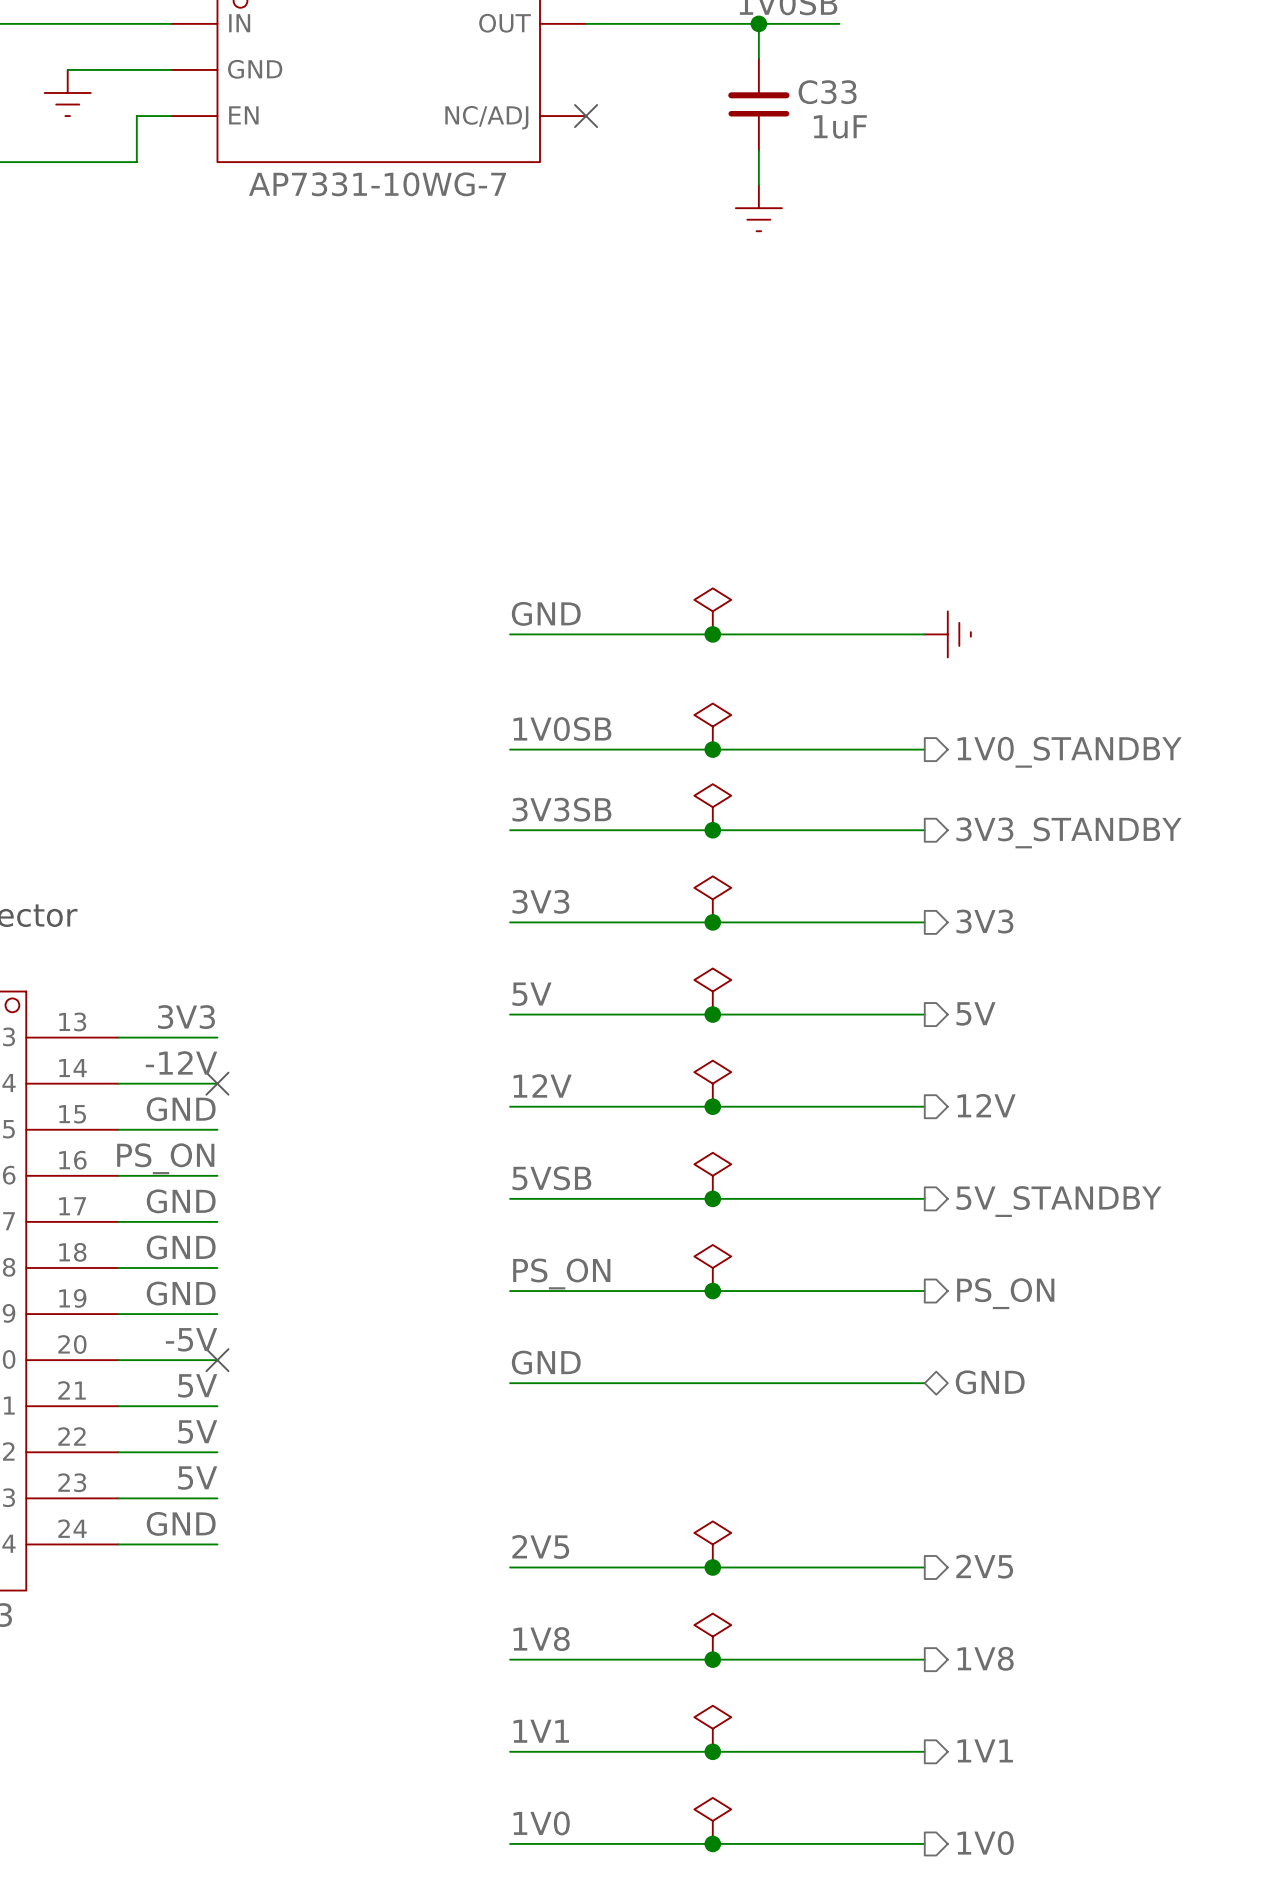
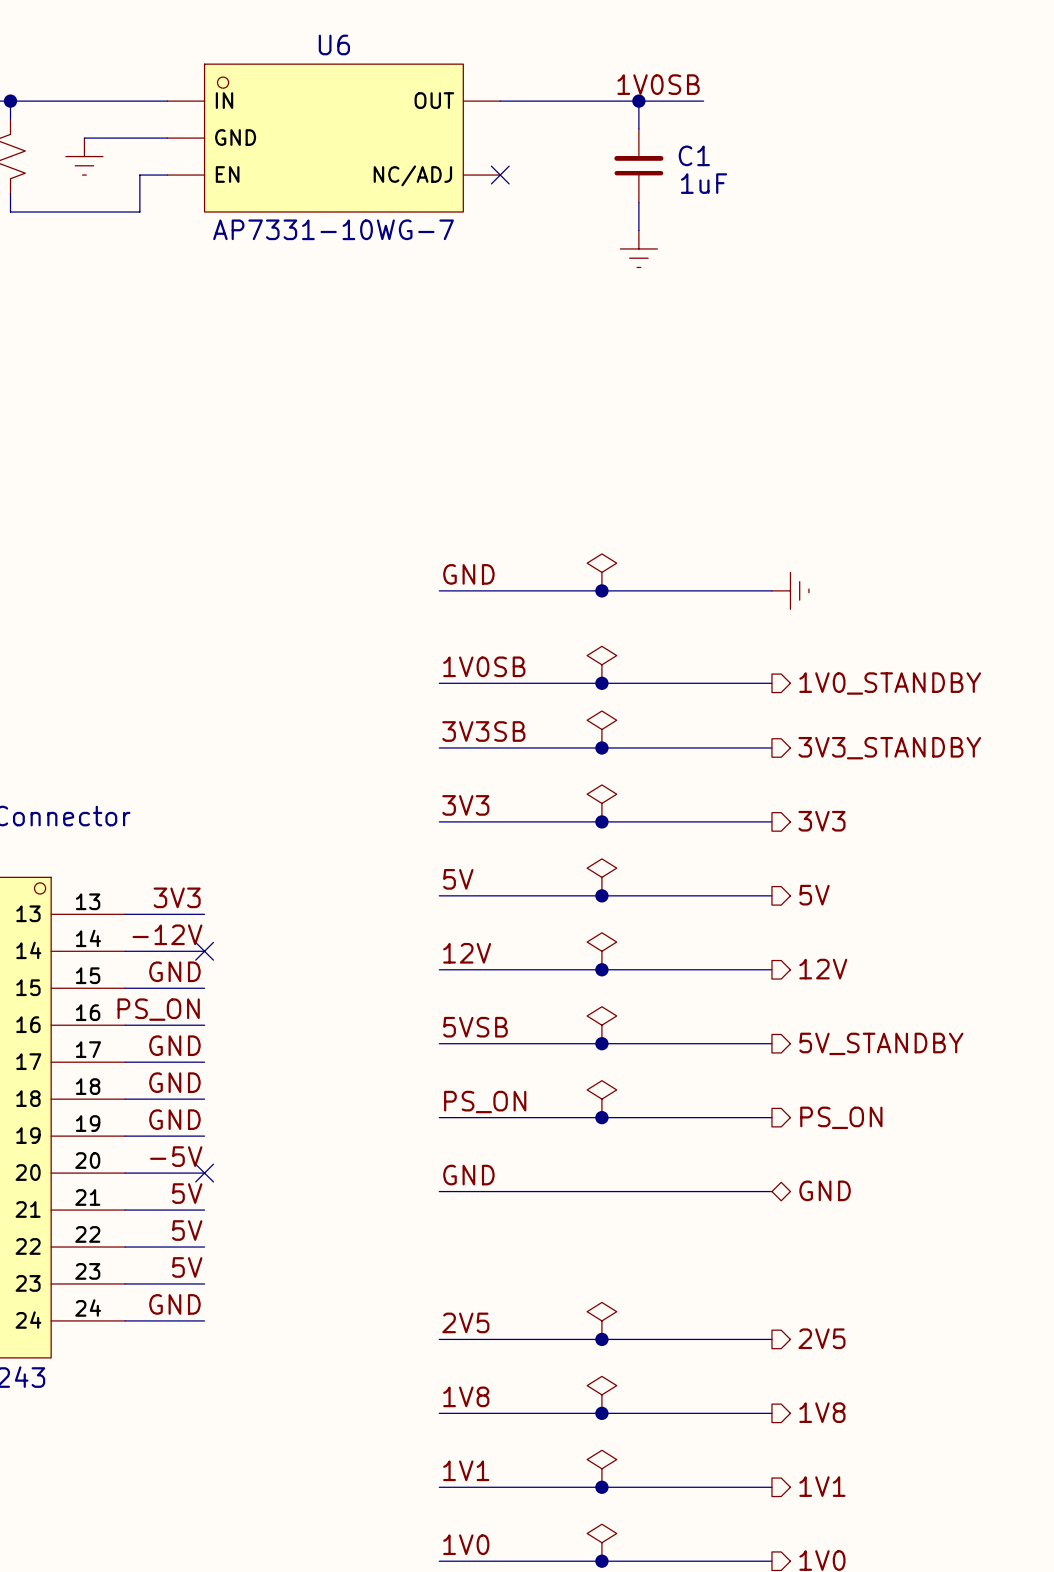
C33 name: C33 (827, 92) -> C1 (694, 155)

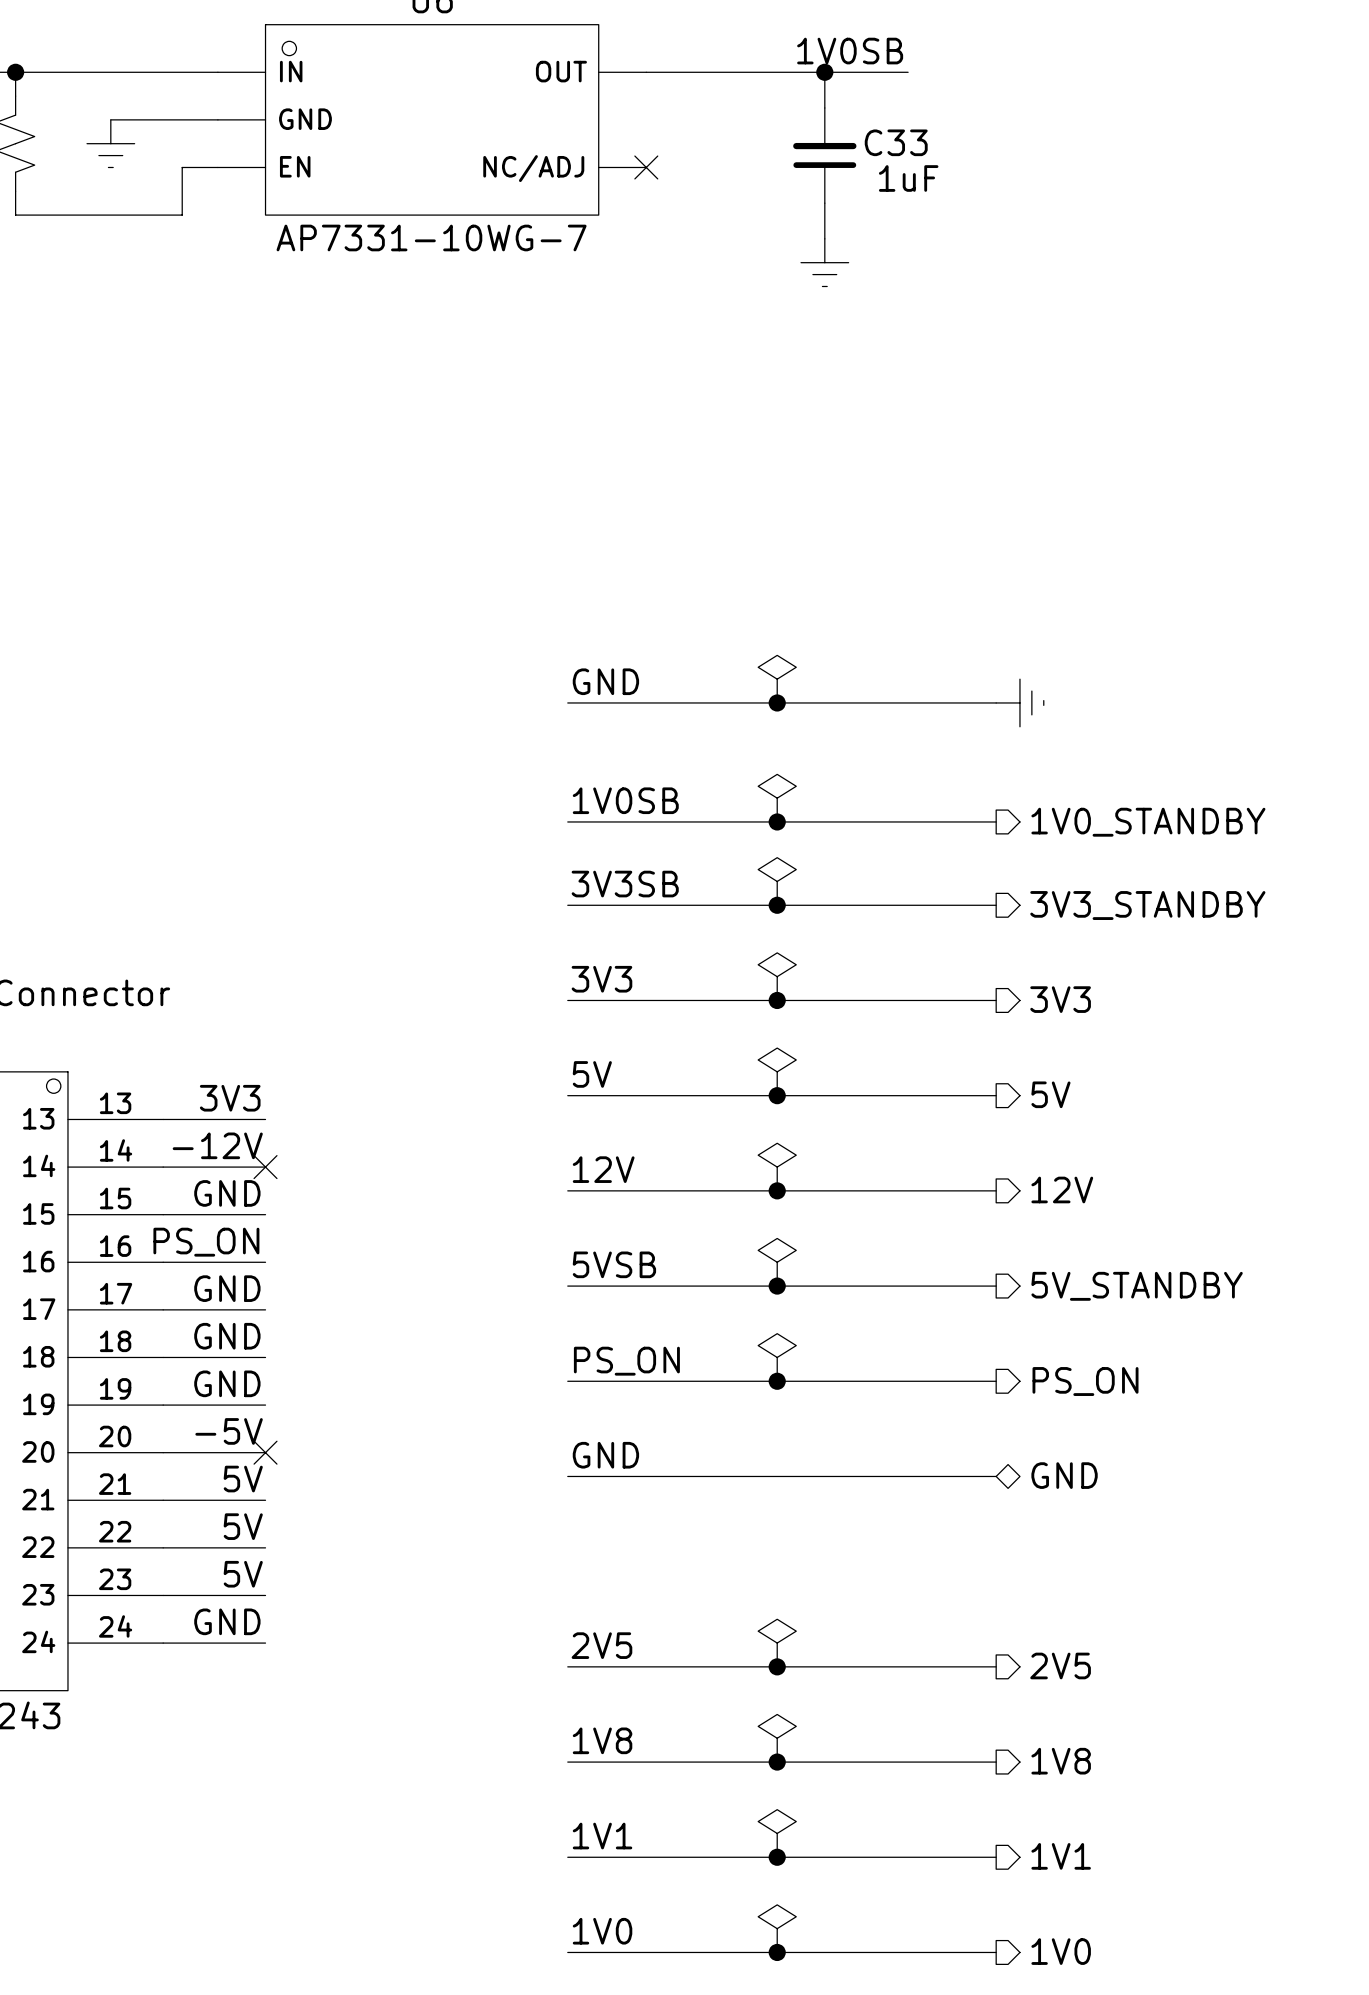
C1 name: C1 (694, 155) -> C33 (896, 142)

